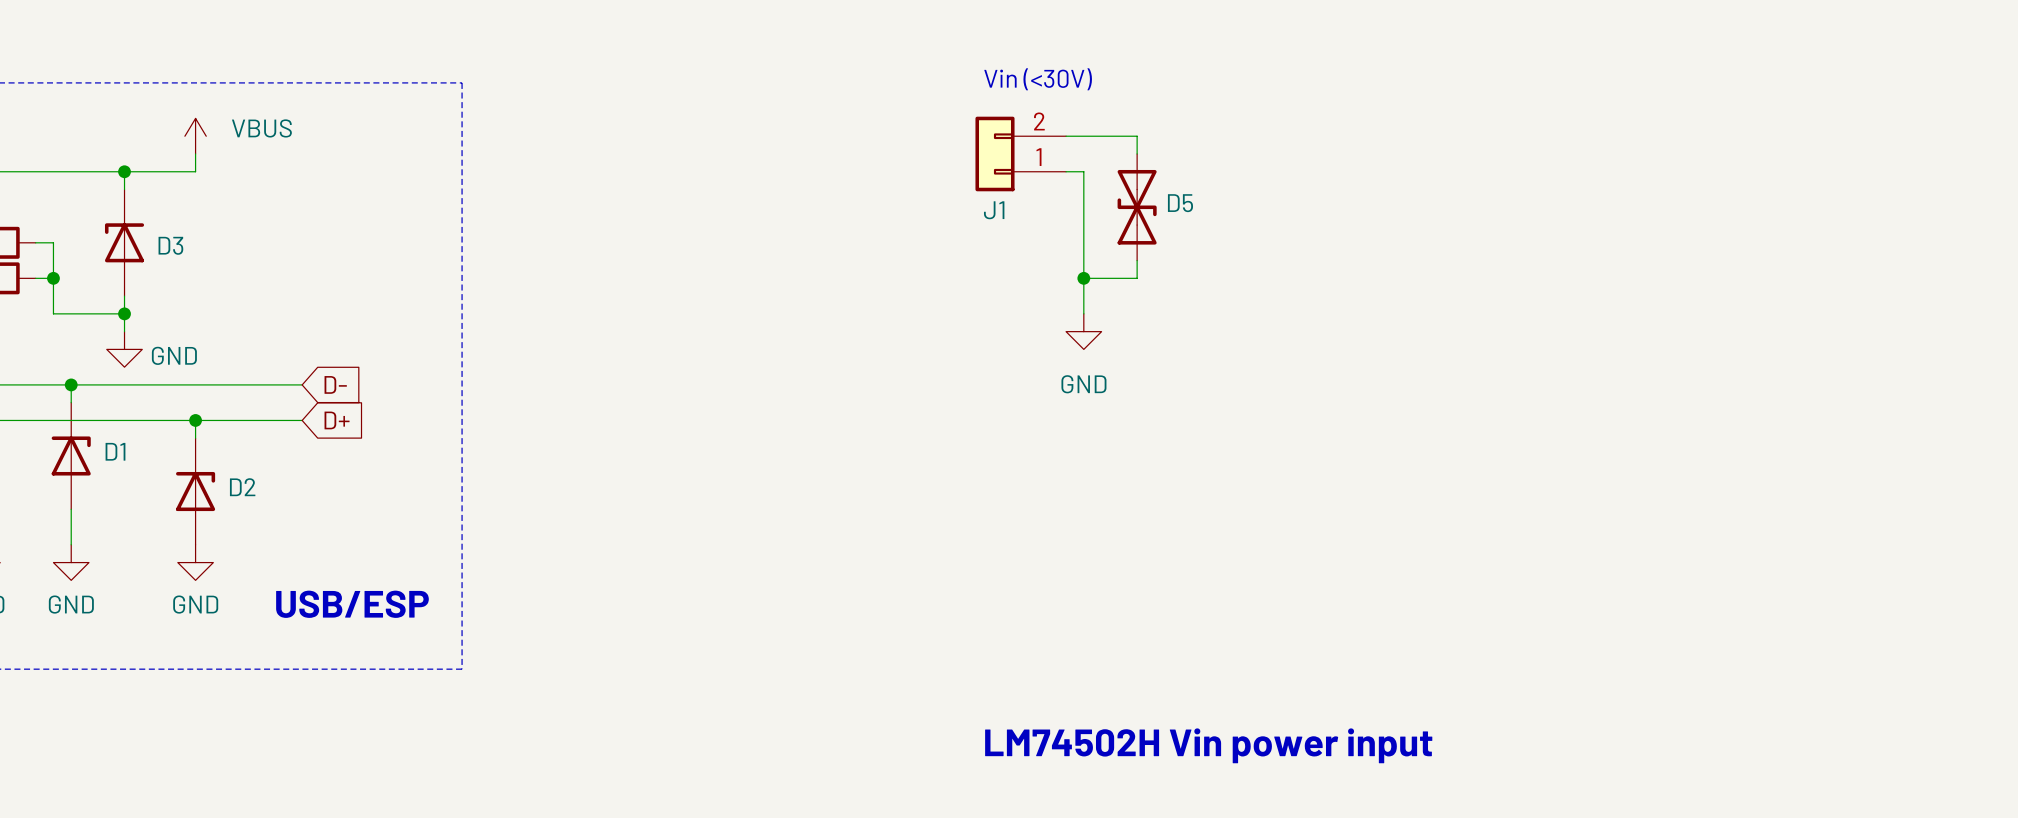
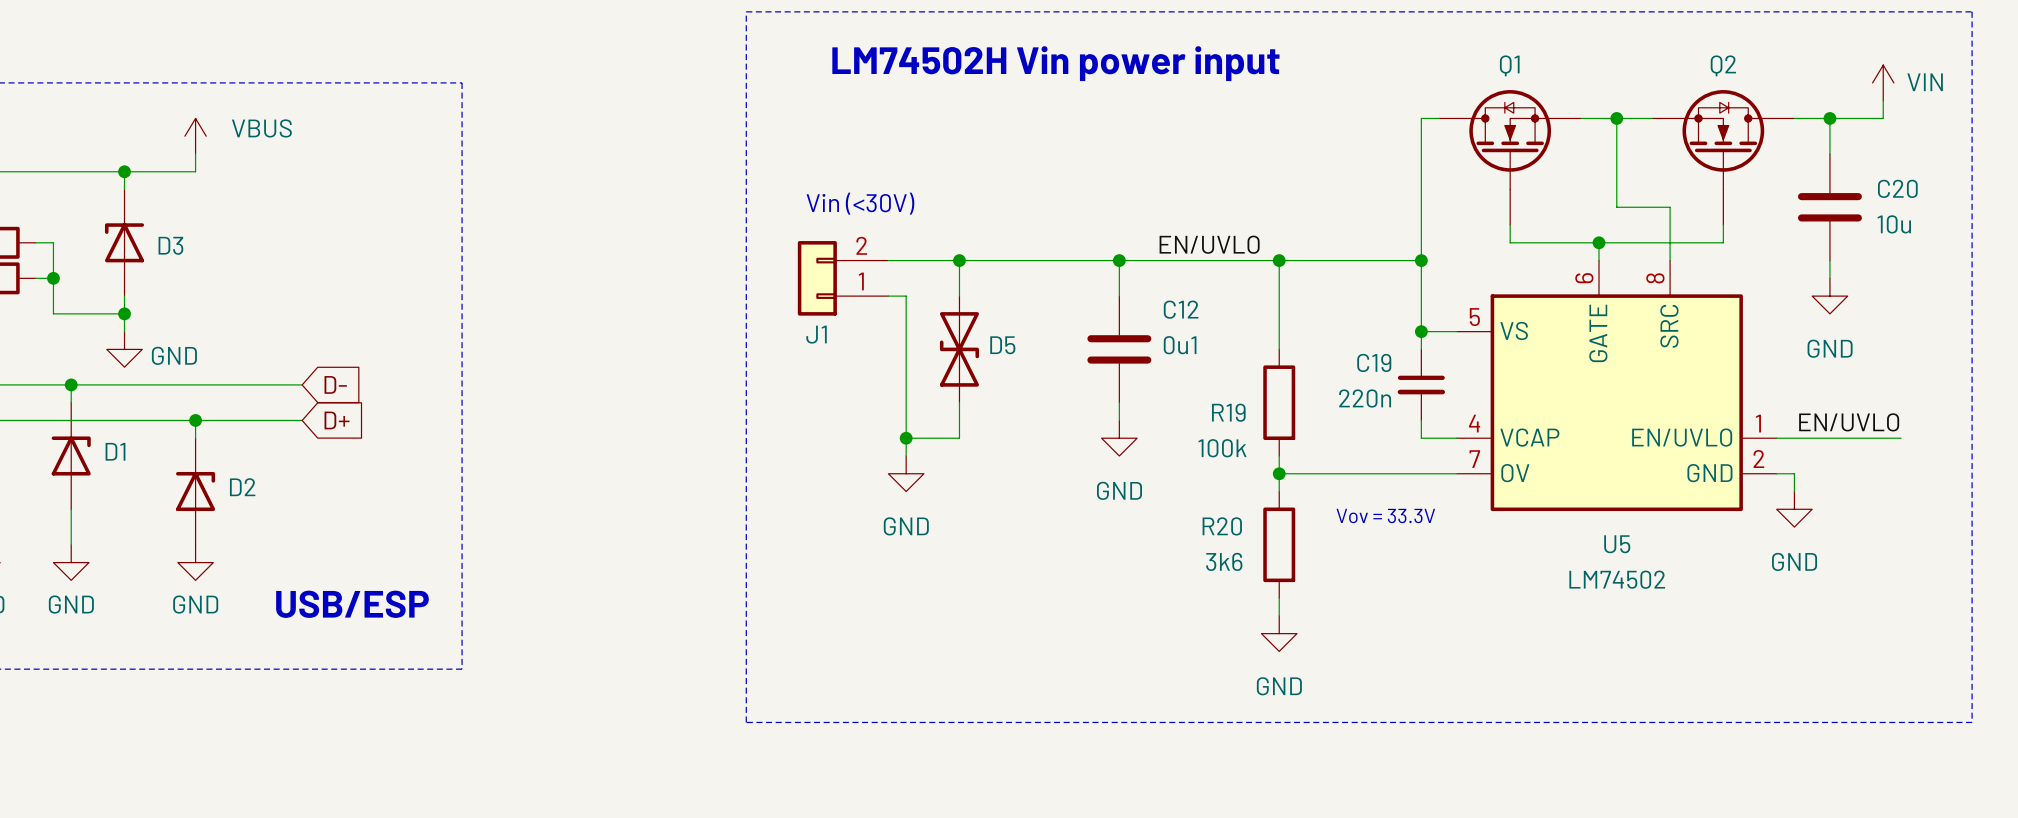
line: none -> (746, 11) (1972, 11) (1972, 722) (746, 722) (746, 11)
text: none -> LM74502H Vin power input (1055, 63)
text position: Vin (<30V) (1038, 79) -> Vin (<30V) (860, 203)
power symbol: none -> VIN (1883, 82)
wire: none -> (1883, 100) (1883, 118) (1794, 118)
wire: none -> (1439, 118) (1421, 118) (1421, 349)
wire: none -> (1581, 118) (1652, 118)
wire: none -> (1616, 118) (1616, 207) (1670, 207) (1670, 260)
junction: none -> (1616, 118)
wire: none -> (1829, 118) (1829, 153)
junction: none -> (1829, 118)
wire: (1066, 136) (1137, 136) (1137, 153) -> none
J1 position: (1020, 153) -> (843, 278)
Q1: none -> (1510, 157)
Q2: none -> (1723, 157)
wire: (1066, 171) (1083, 171) (1083, 313) -> none
D5 position: (1137, 207) -> (959, 349)
C20: none -> 10u (1829, 207)
wire: none -> (1510, 225) (1510, 242) (1723, 242) (1723, 225)
wire: none -> (1599, 242) (1599, 260)
junction: none -> (1599, 242)
label: none -> EN/UVLO (1209, 244)
wire: none -> (888, 260) (1421, 260)
wire: none -> (959, 260) (959, 296)
junction: none -> (959, 260)
wire: none -> (1119, 260) (1119, 296)
wire: (1137, 260) (1137, 278) (1083, 278) -> none
wire: none -> (1279, 260) (1279, 349)
junction: none -> (1279, 260)
junction: none -> (1421, 260)
wire: none -> (1829, 260) (1829, 278)
junction position: (1083, 278) -> (1119, 260)
wire: none -> (888, 296) (906, 296) (906, 455)
power symbol: none -> GND (1829, 296)
power symbol position: GND (1083, 331) -> GND (1119, 438)
wire: none -> (1421, 331) (1456, 331)
junction: none -> (1421, 331)
C12: none -> 0u1 (1119, 349)
C19: none -> 220n (1421, 384)
U5: none -> LM74502 (1616, 385)
wire: none -> (959, 402) (959, 438) (906, 438)
wire: none -> (1119, 402) (1119, 420)
R19: none -> 100k (1279, 402)
wire: none -> (1421, 420) (1421, 438) (1456, 438)
label: none -> EN/UVLO (1849, 422)
junction: none -> (906, 438)
wire: none -> (1776, 438) (1901, 438)
wire: none -> (1279, 455) (1279, 491)
power symbol: none -> GND (906, 473)
wire: none -> (1279, 473) (1456, 473)
junction: none -> (1279, 473)
wire: none -> (1776, 473) (1794, 473) (1794, 491)
power symbol: none -> GND (1794, 509)
text: none -> Vov = 33.3V (1385, 516)
R20: none -> 3k6 (1279, 544)
wire: none -> (1279, 598) (1279, 615)
power symbol: none -> GND (1279, 633)
text: LM74502H Vin power input (1208, 745) -> none

